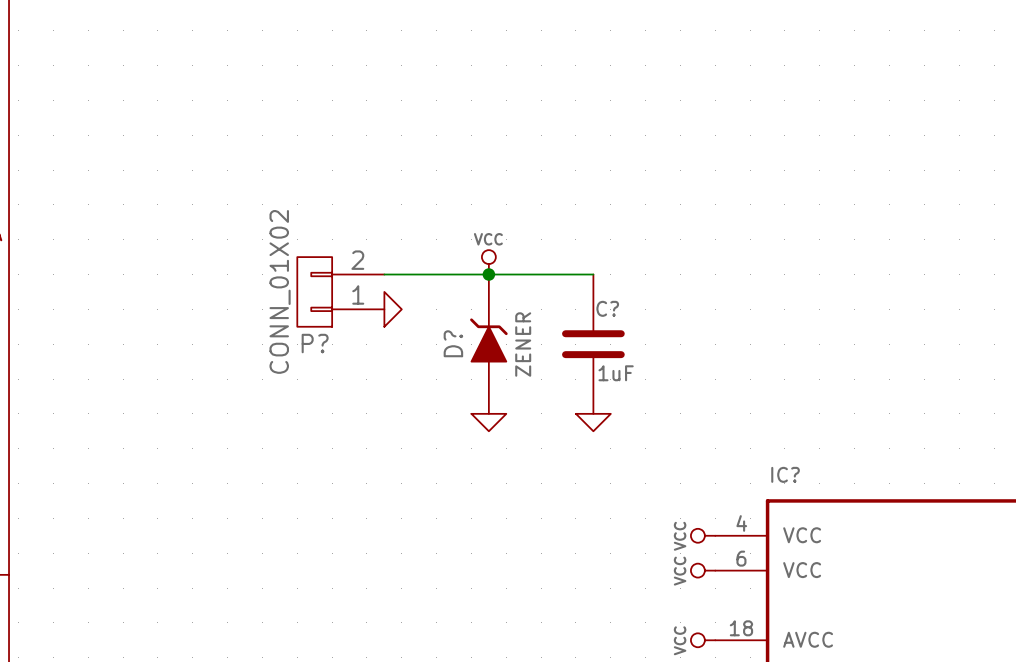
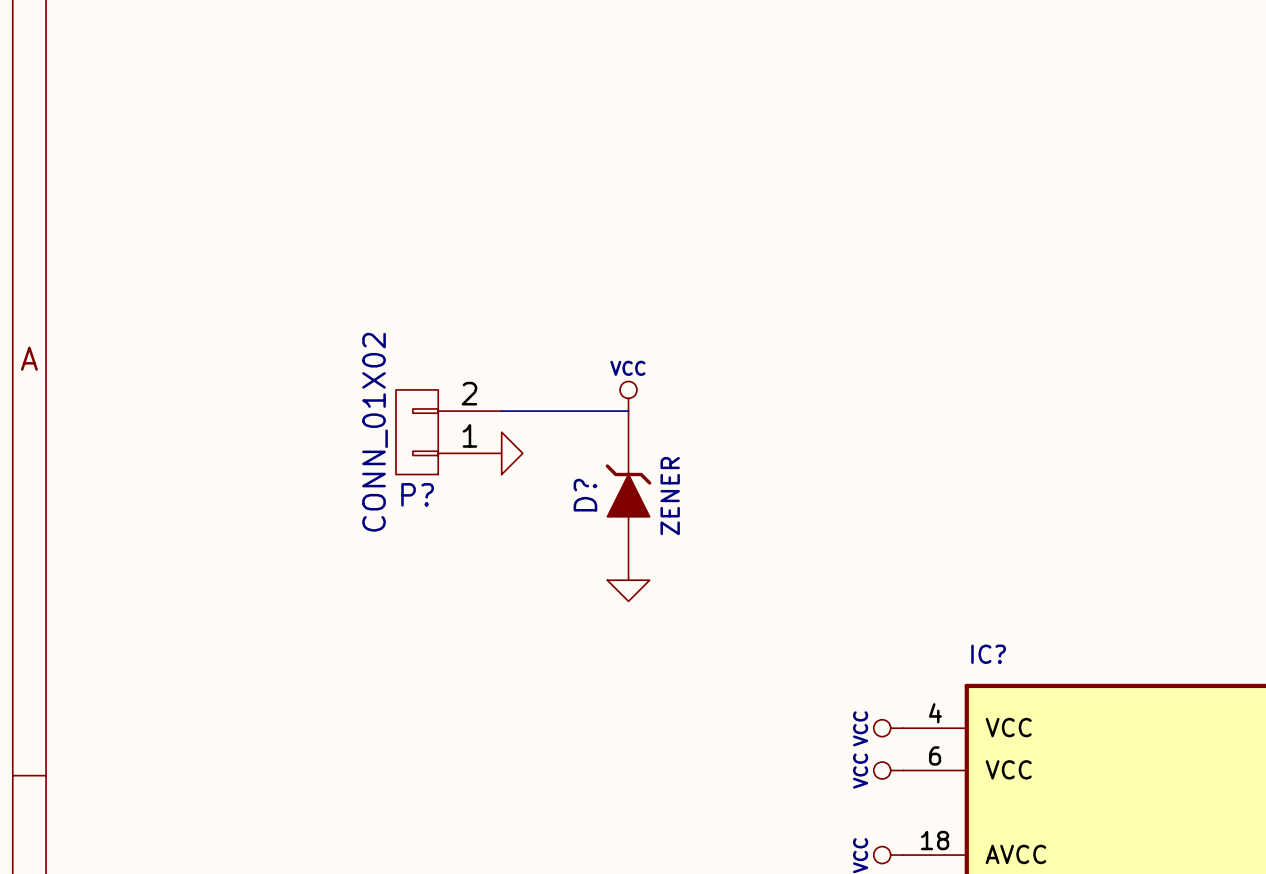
wire: (488, 274) (593, 274) -> none
junction: (488, 274) -> none
C?: 1uF (593, 344) -> none
power symbol: (593, 422) -> none

